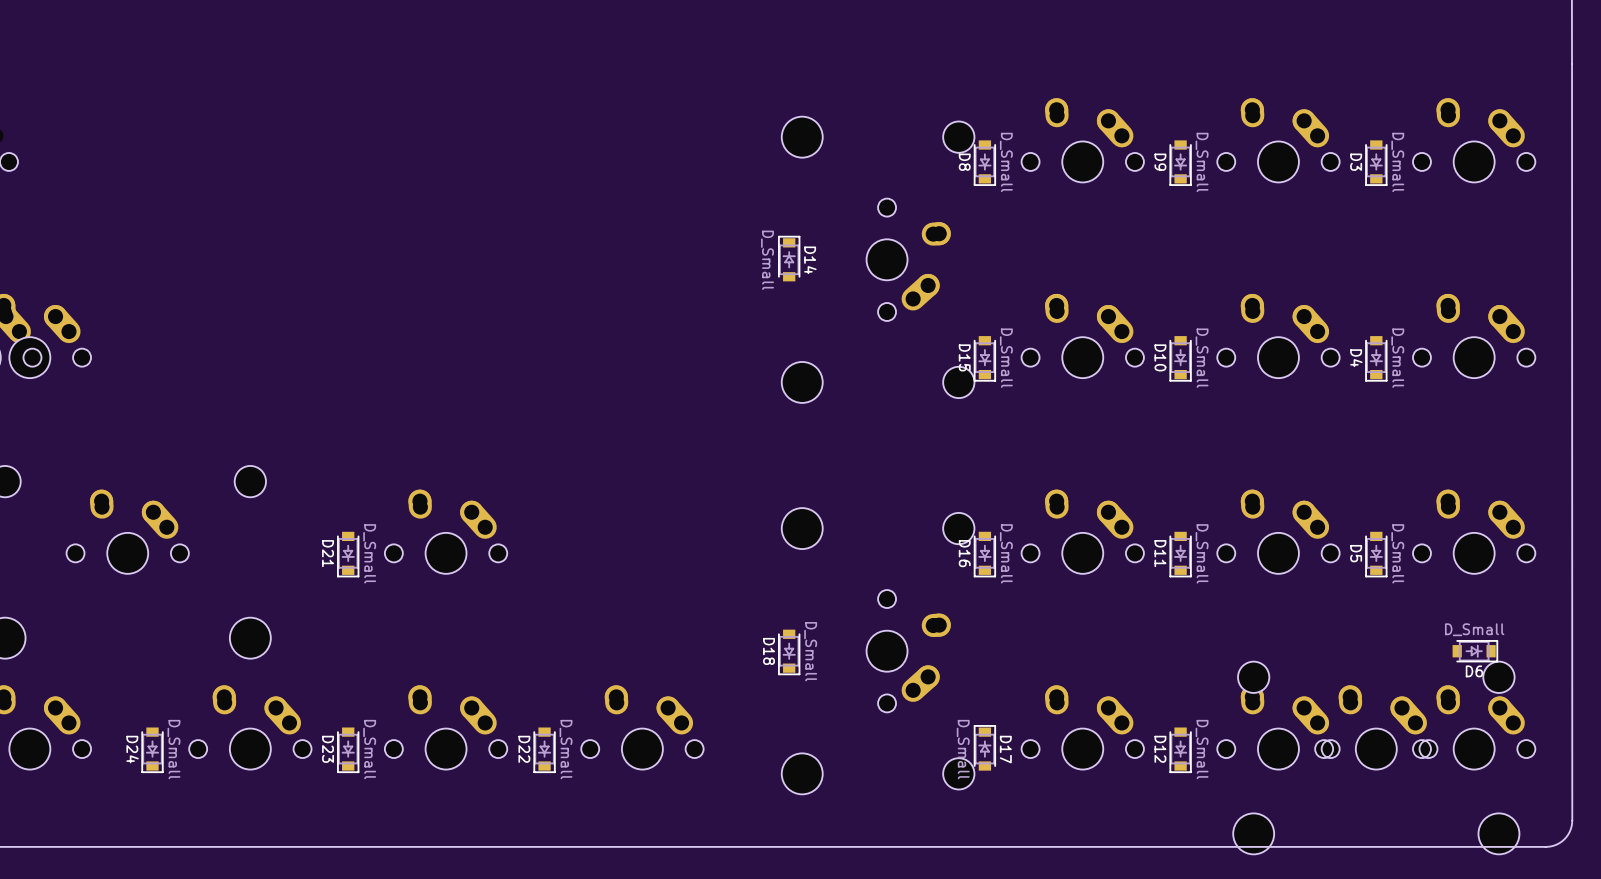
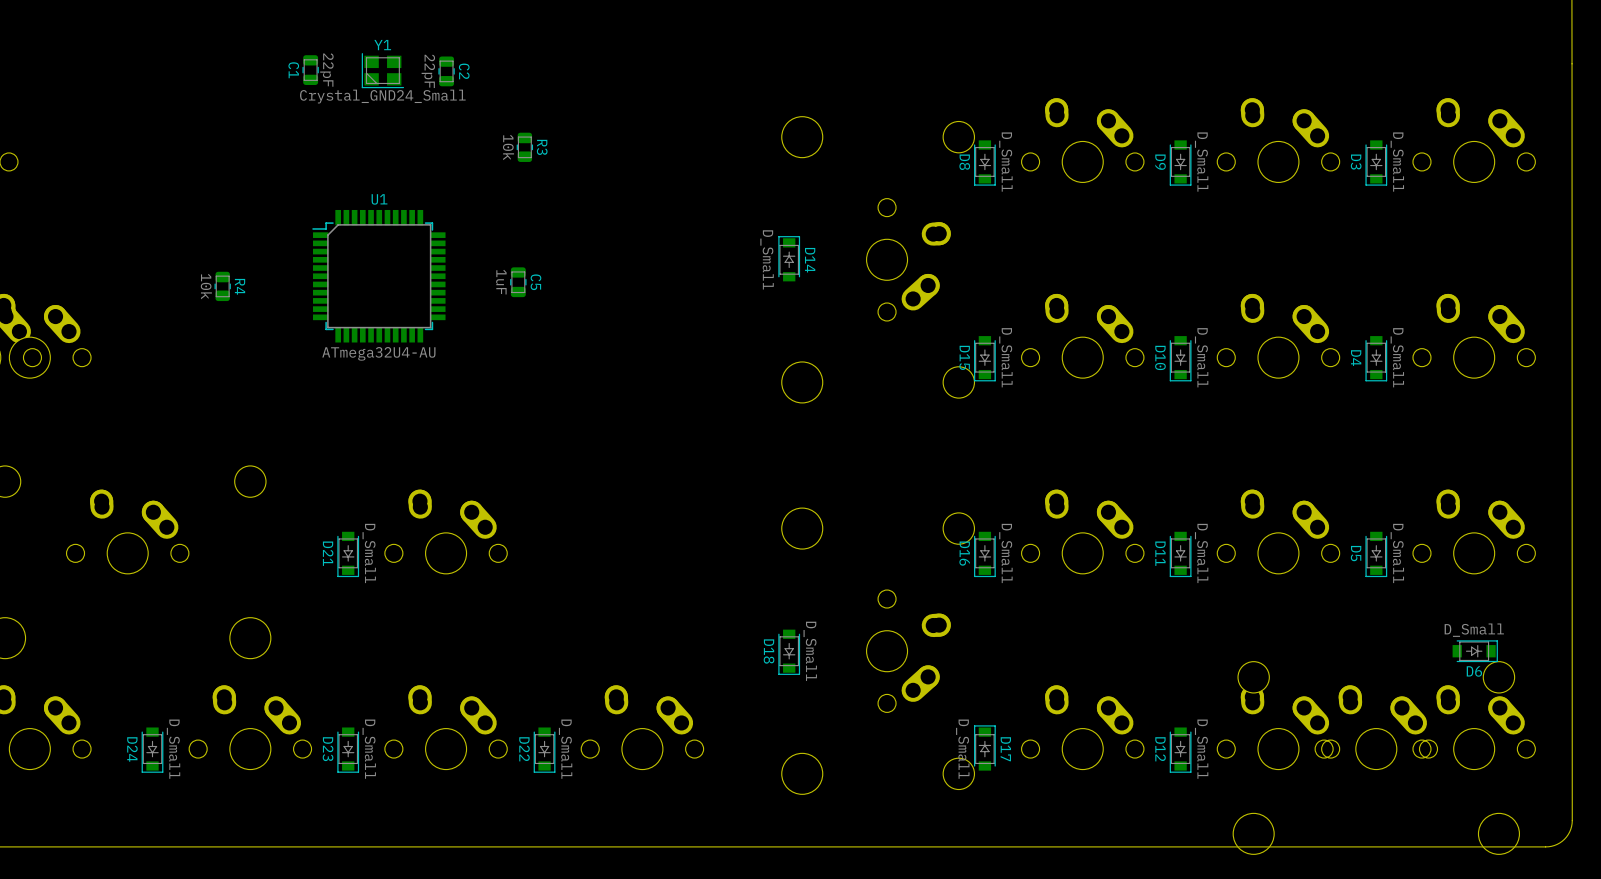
C1: none -> 22pF (310, 70)
Y1: none -> Crystal_GND24_Small (382, 70)
C2: none -> 22pF (446, 71)
R3: none -> 10k (524, 147)
U1: none -> ATmega32U4-AU (378, 276)
C5: none -> 1uF (518, 282)
R4: none -> 10k (222, 286)

